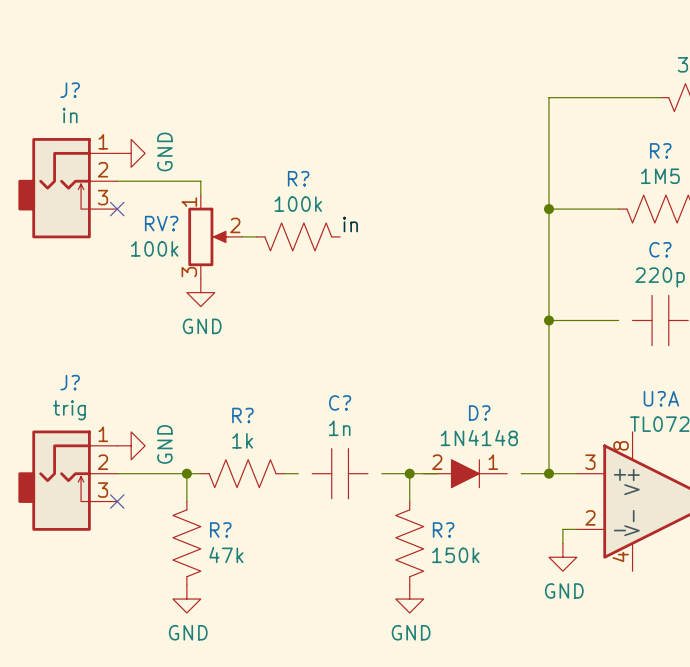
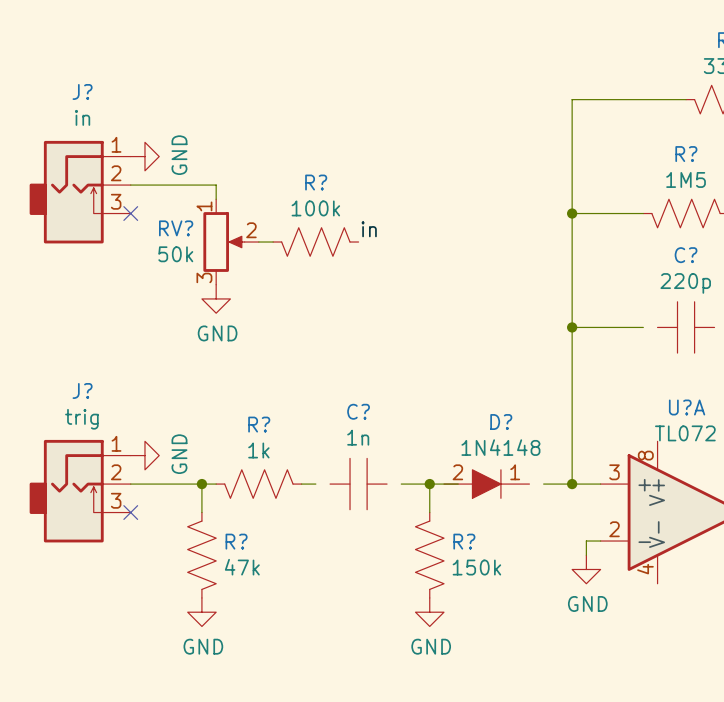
RV? value: 100k (154, 248) -> 50k (175, 254)

